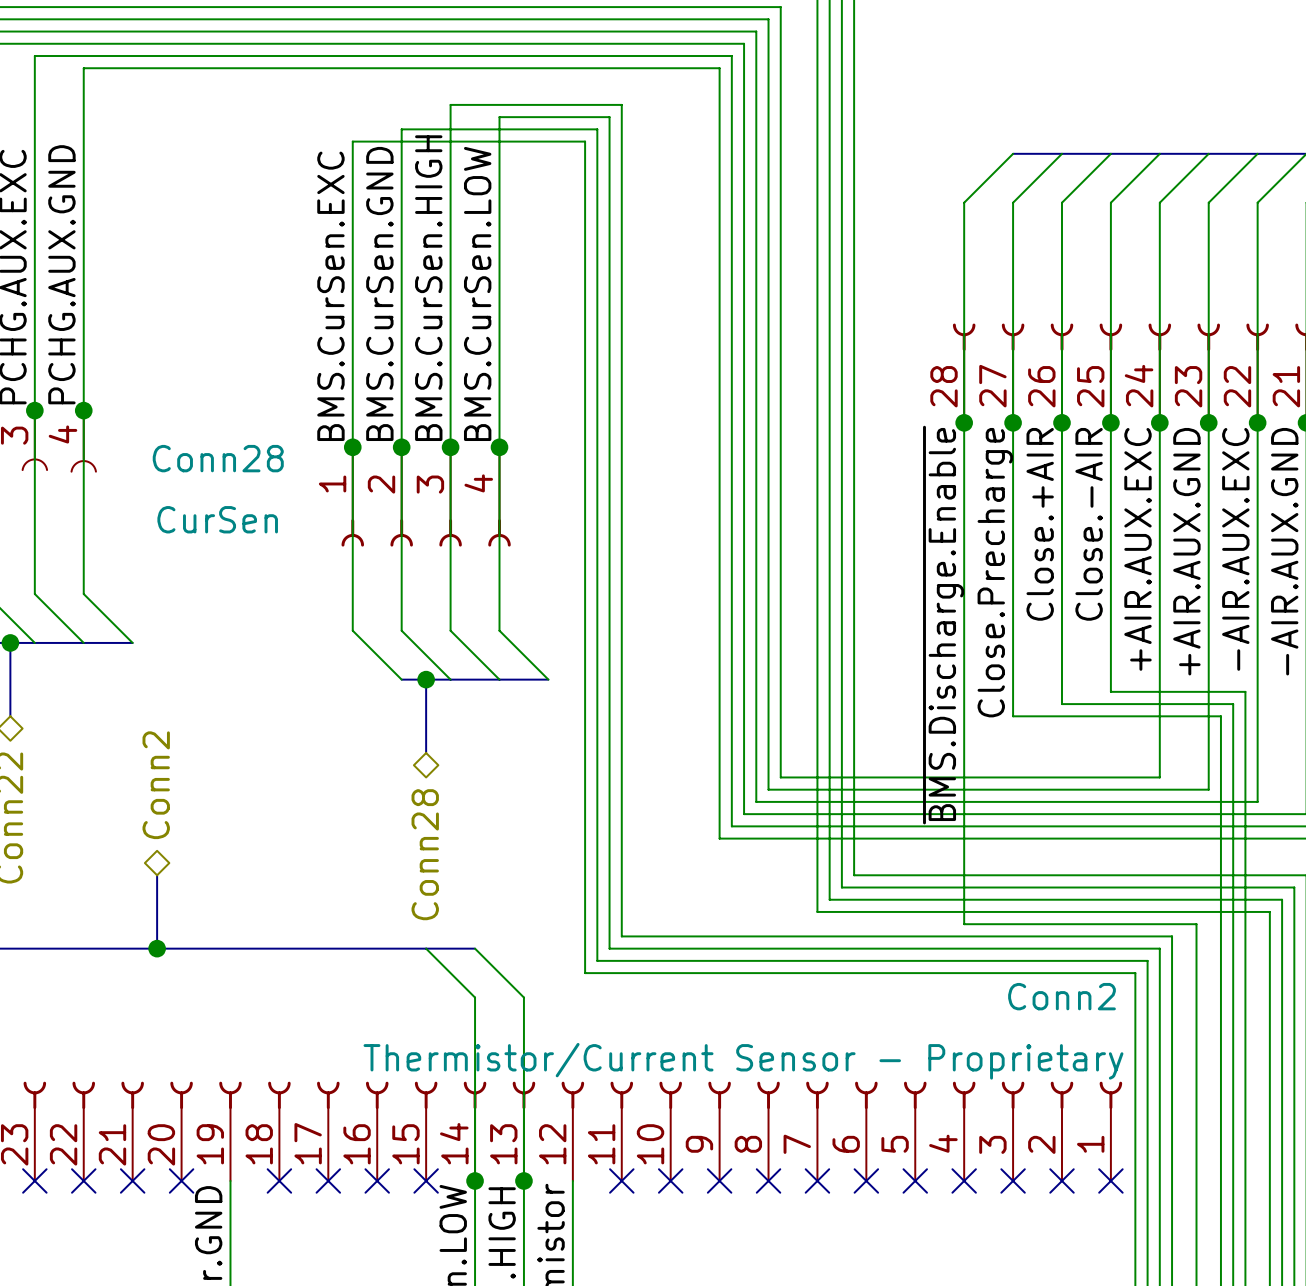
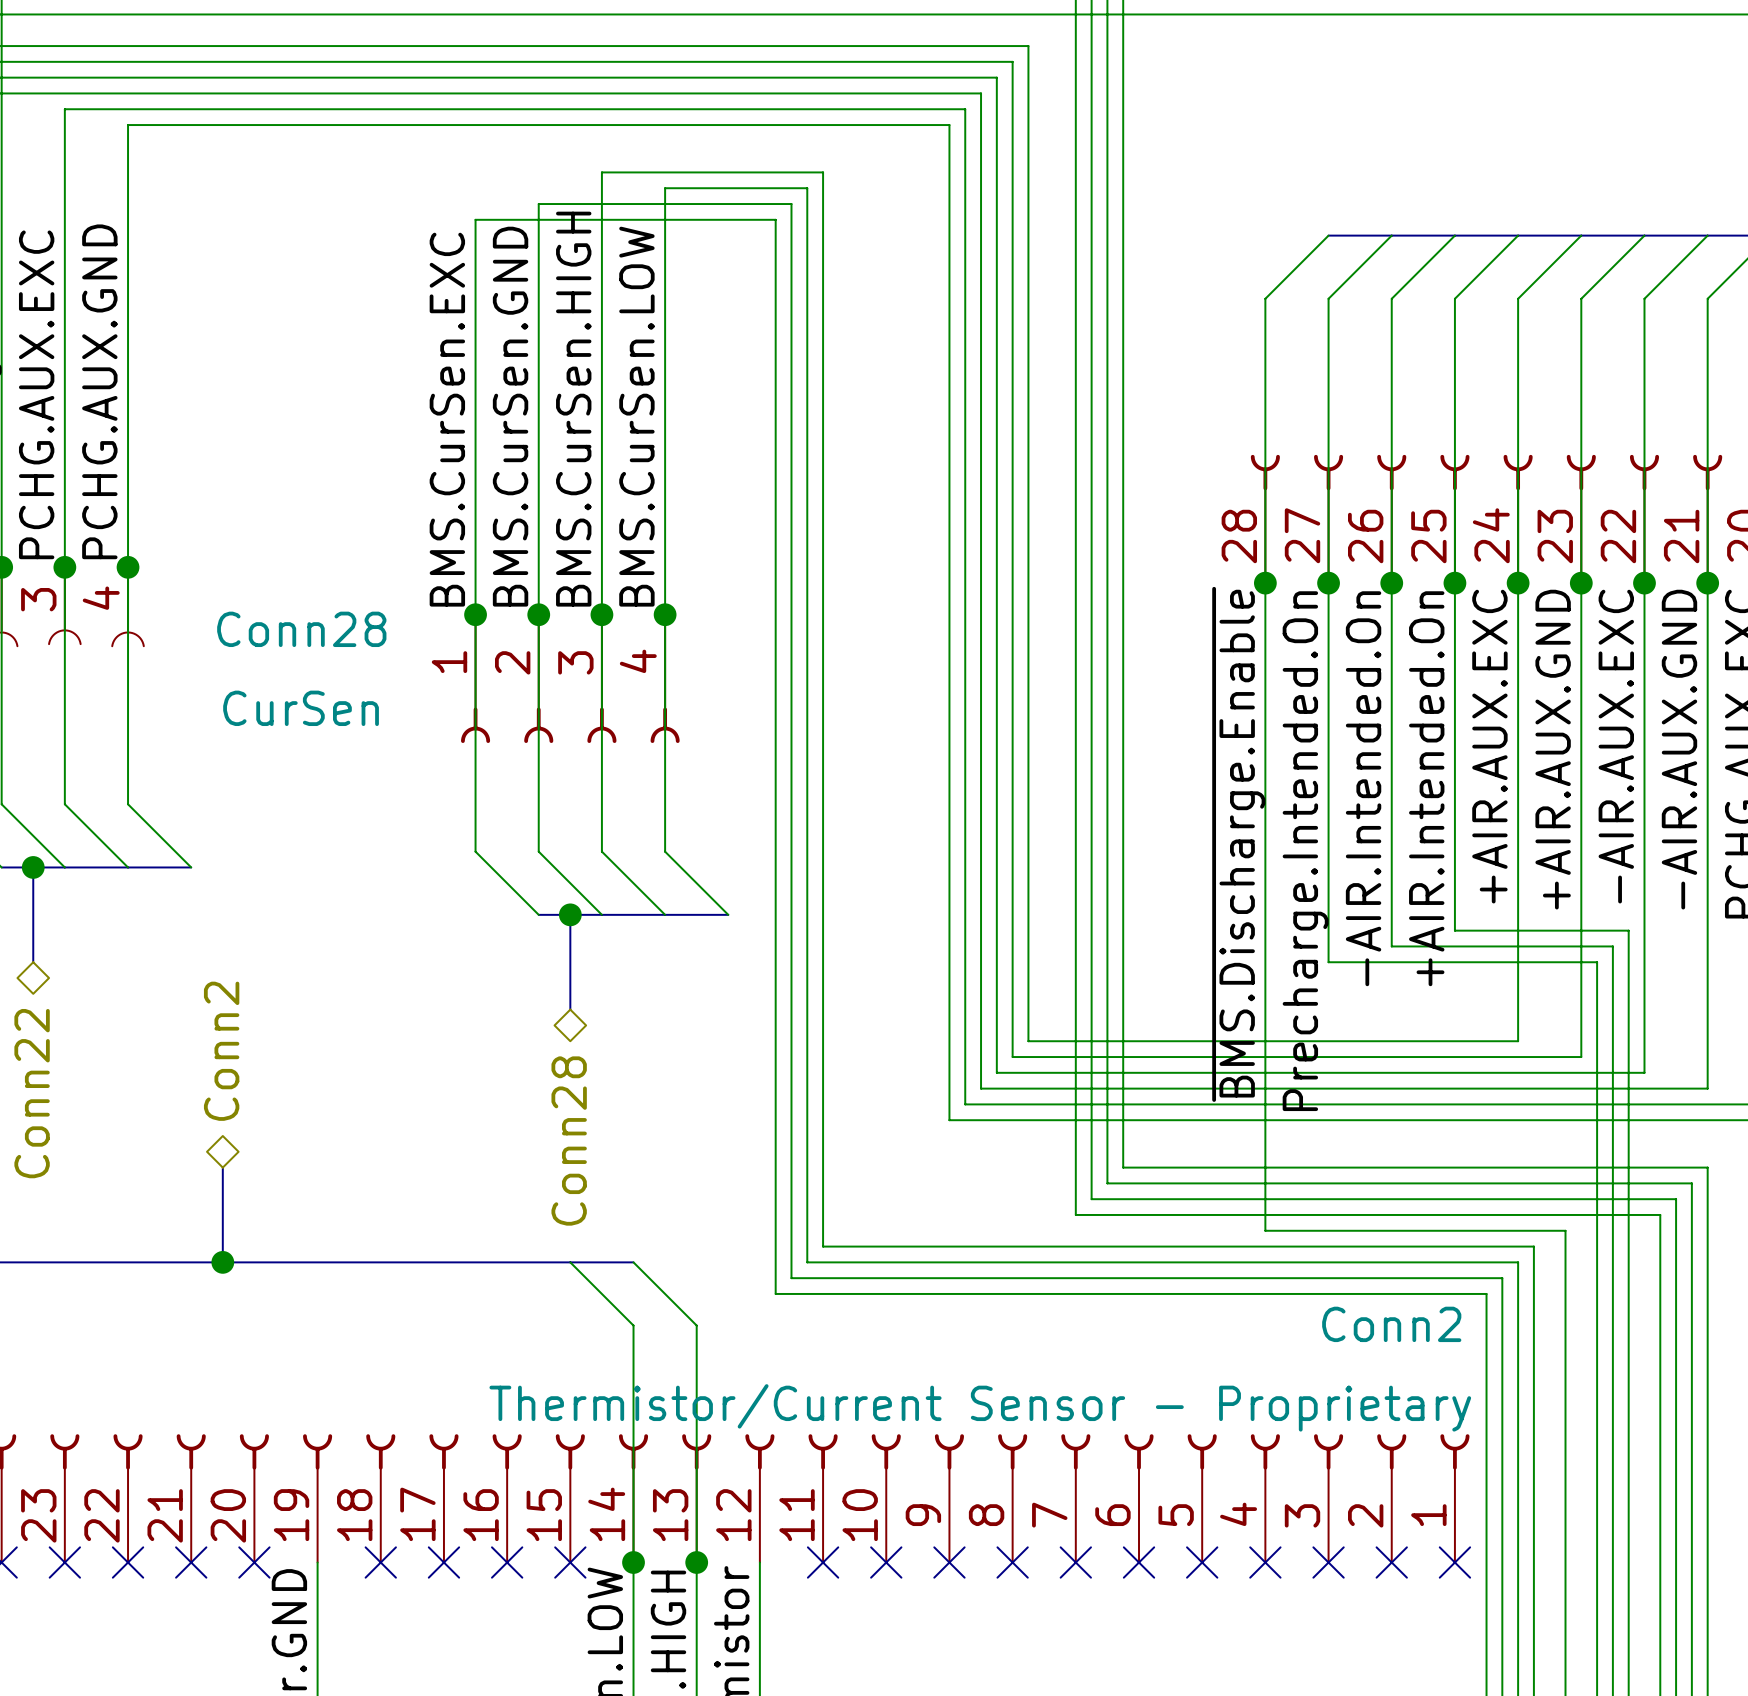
label: Close.+AIR (1040, 524) -> -AIR.Intended.On (1363, 788)
label: Close.-AIR (1089, 524) -> +AIR.Intended.On (1426, 788)
label: Close.Precharge (995, 572) -> Precharge.Intended.On (1305, 851)

